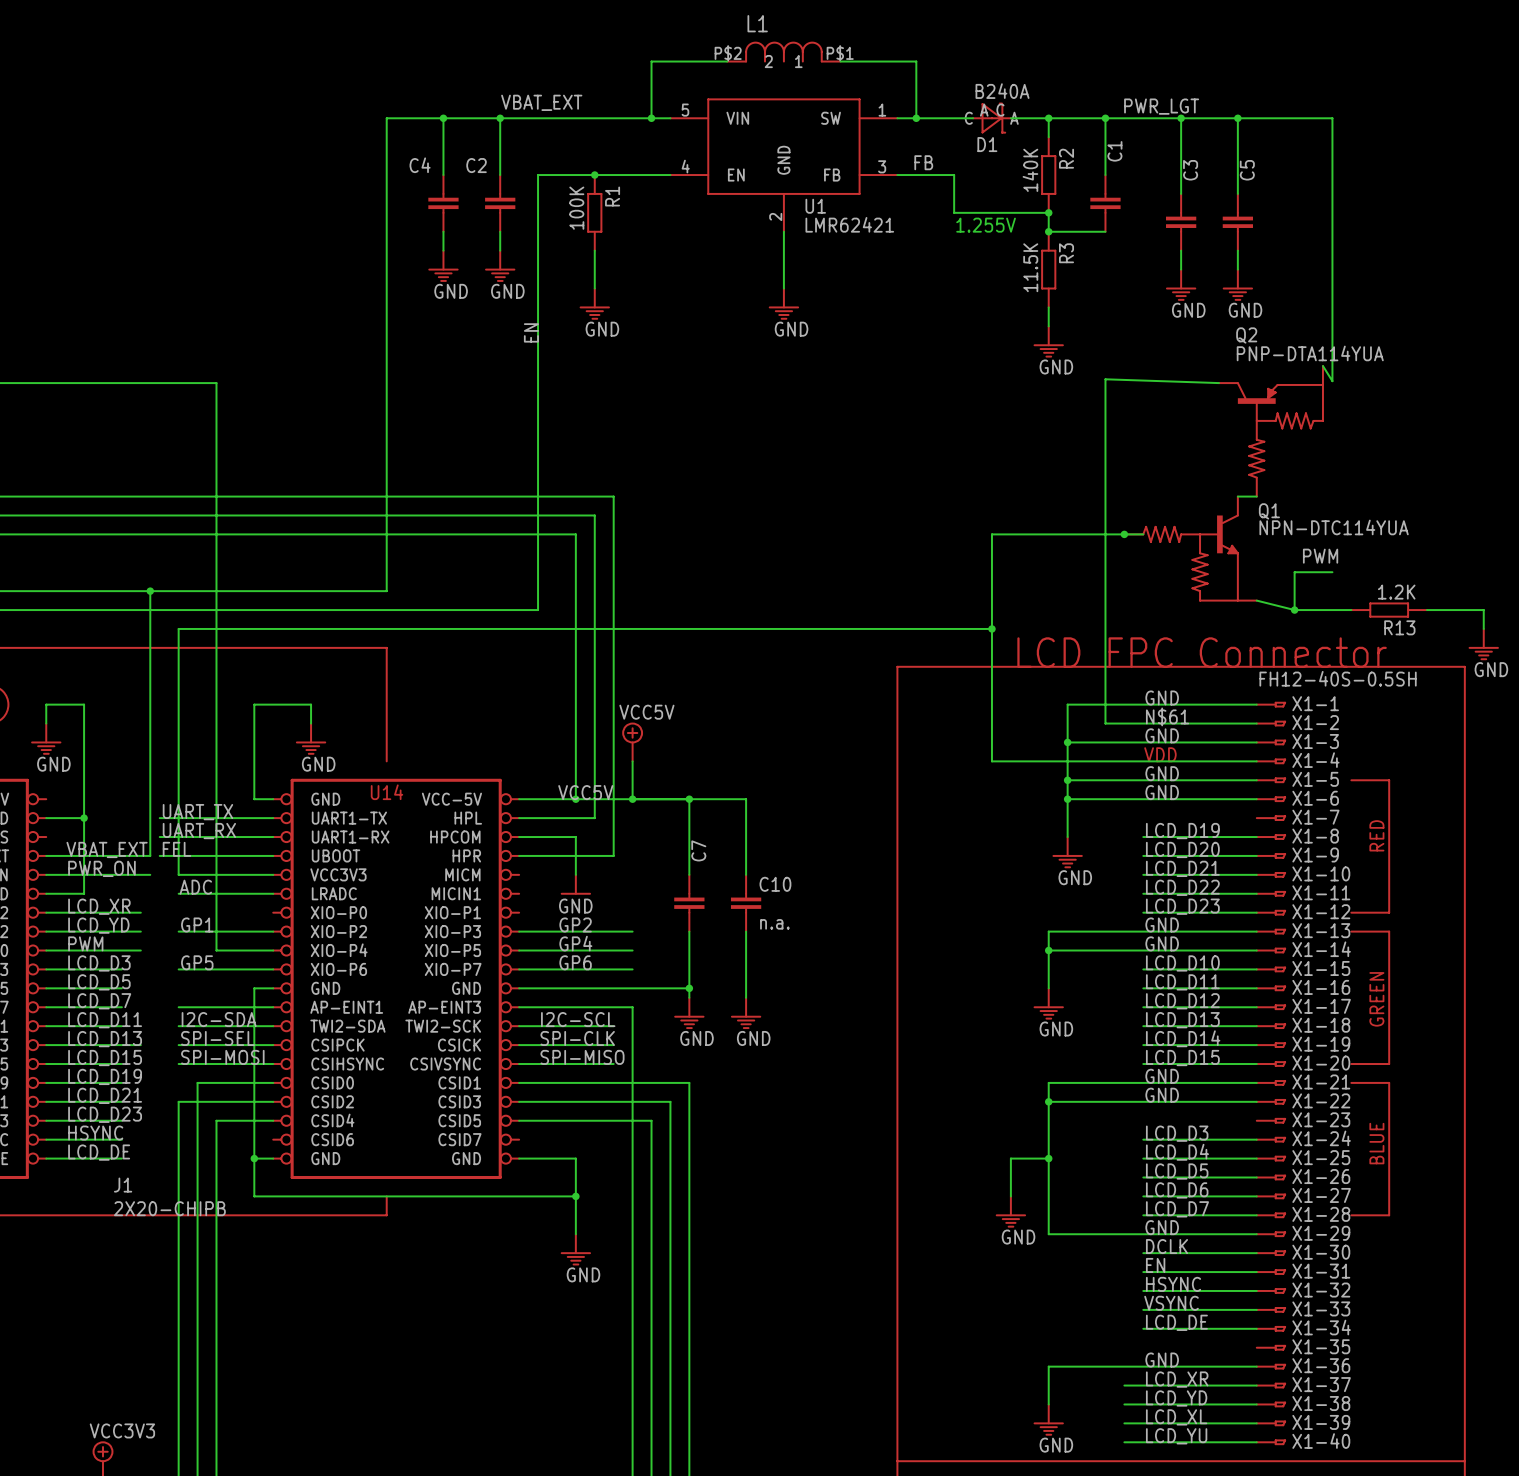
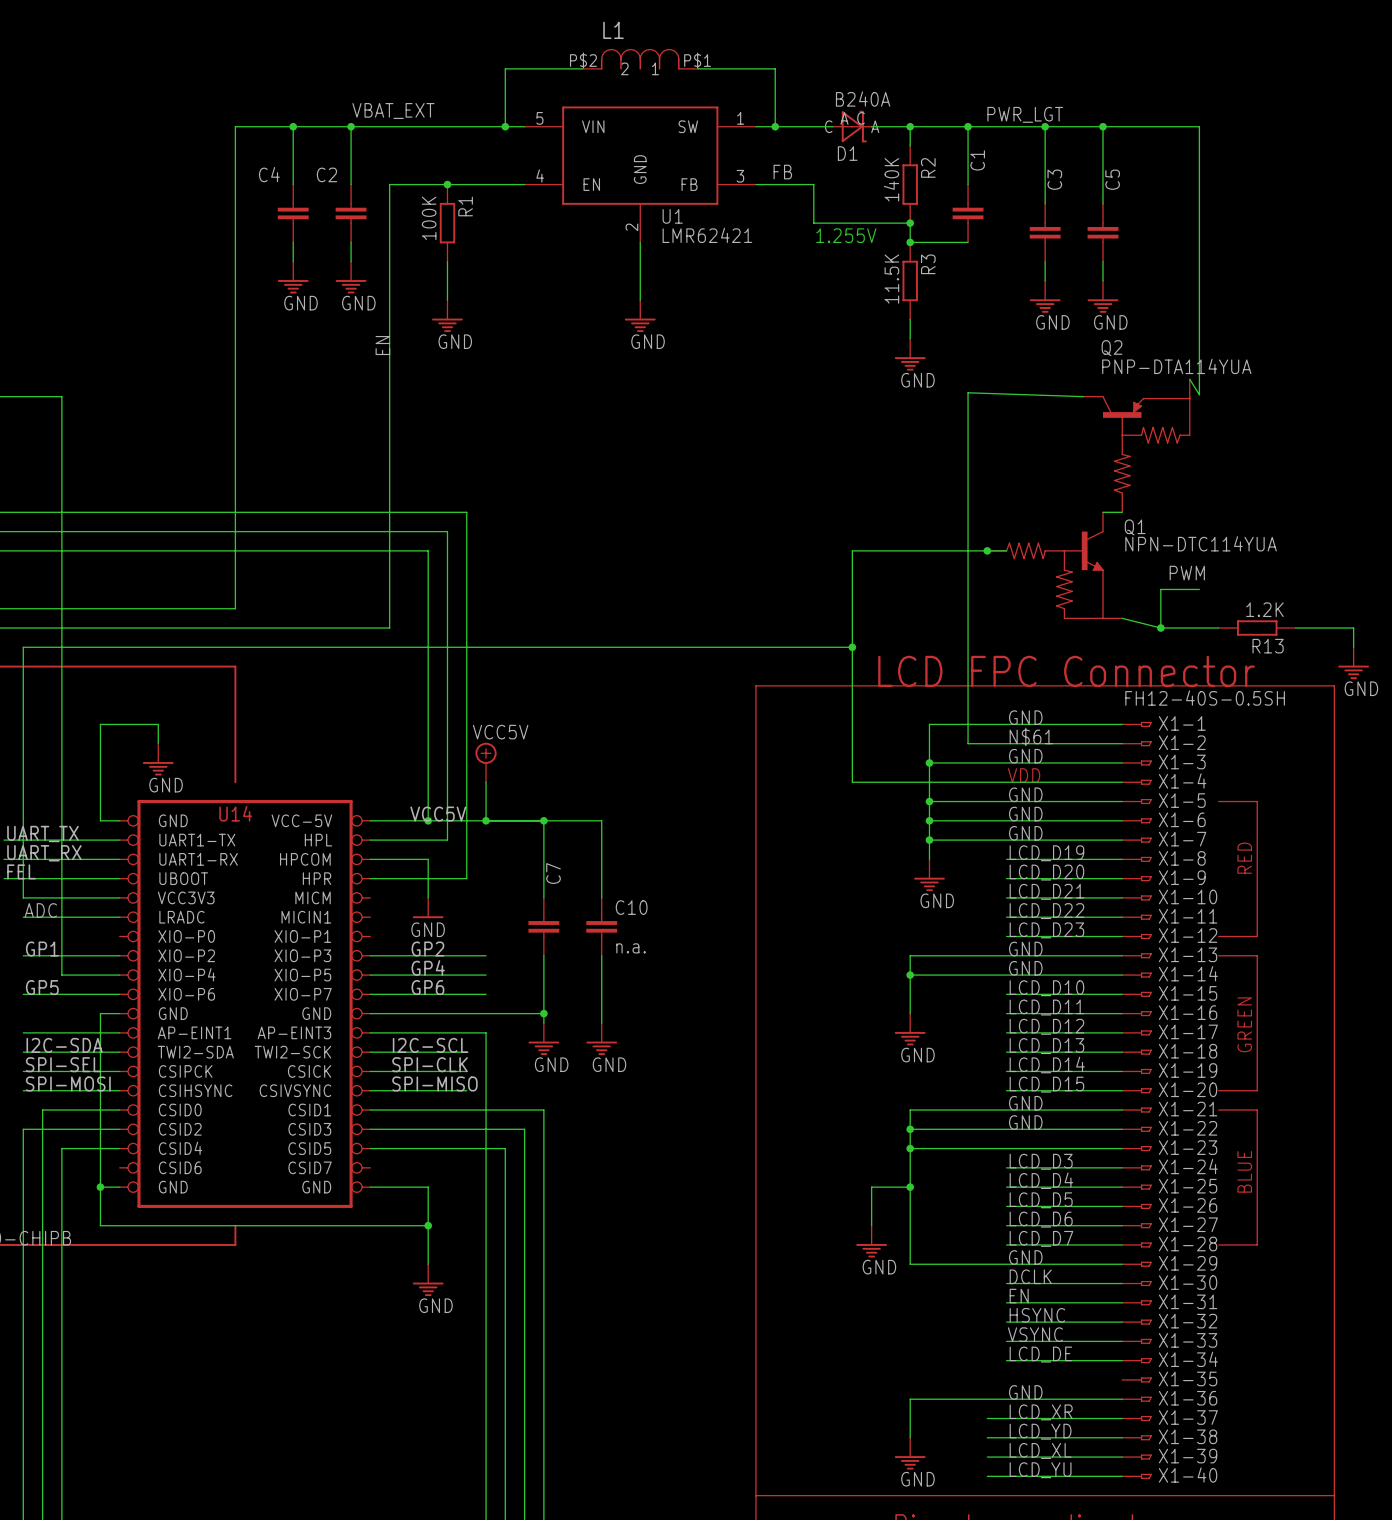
label: none -> GND (1025, 833)
wire: none -> (929, 840) (1122, 840)
junction: none -> (929, 840)
wire: none -> (910, 1148) (1122, 1148)
junction: none -> (910, 1148)

